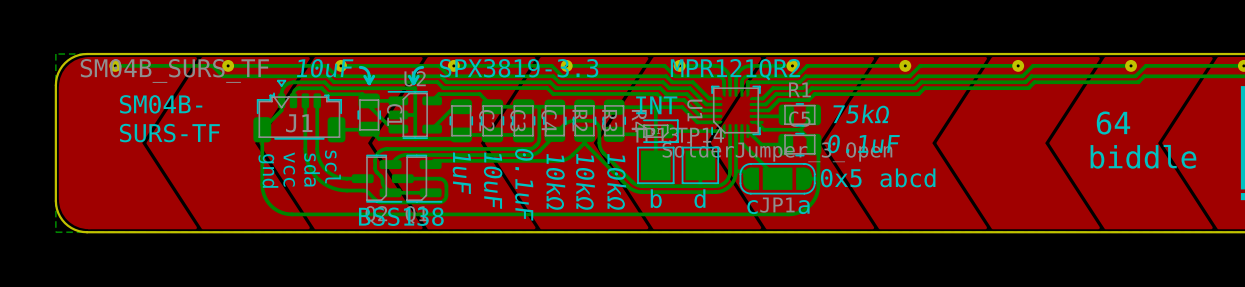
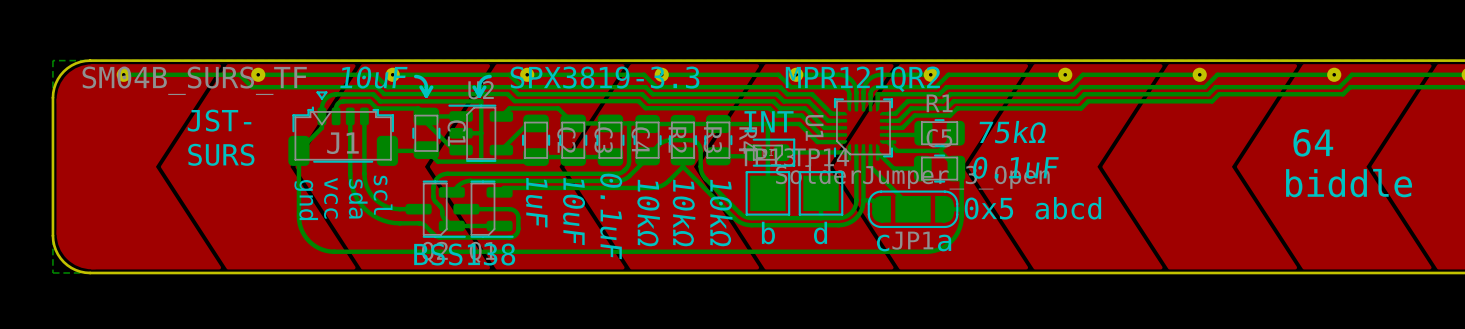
text: SM04B- (161, 104) -> none
text: none -> JST- (219, 120)
text: SURS-TF (169, 133) -> SURS (221, 154)

